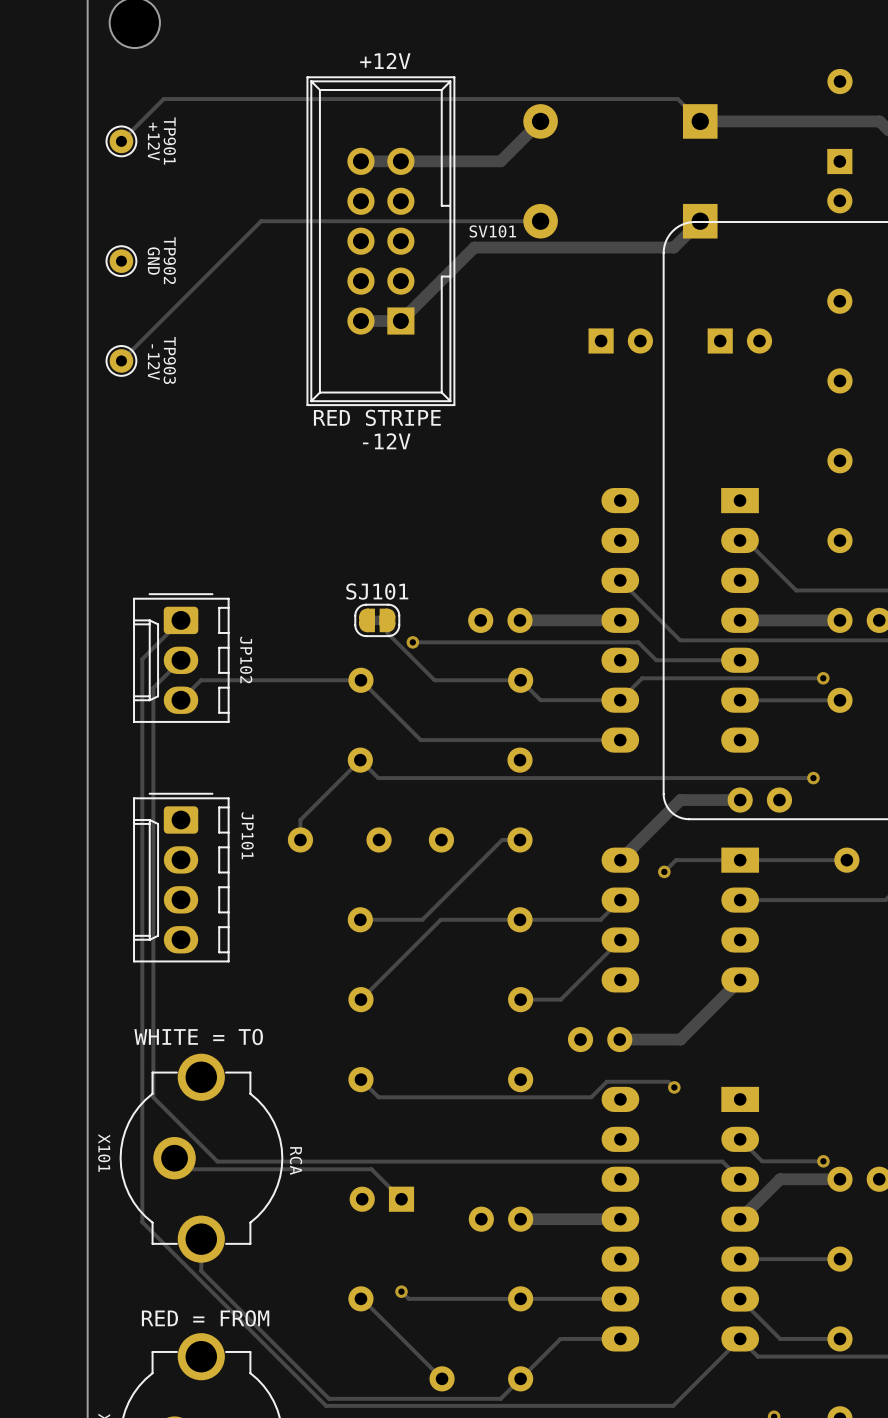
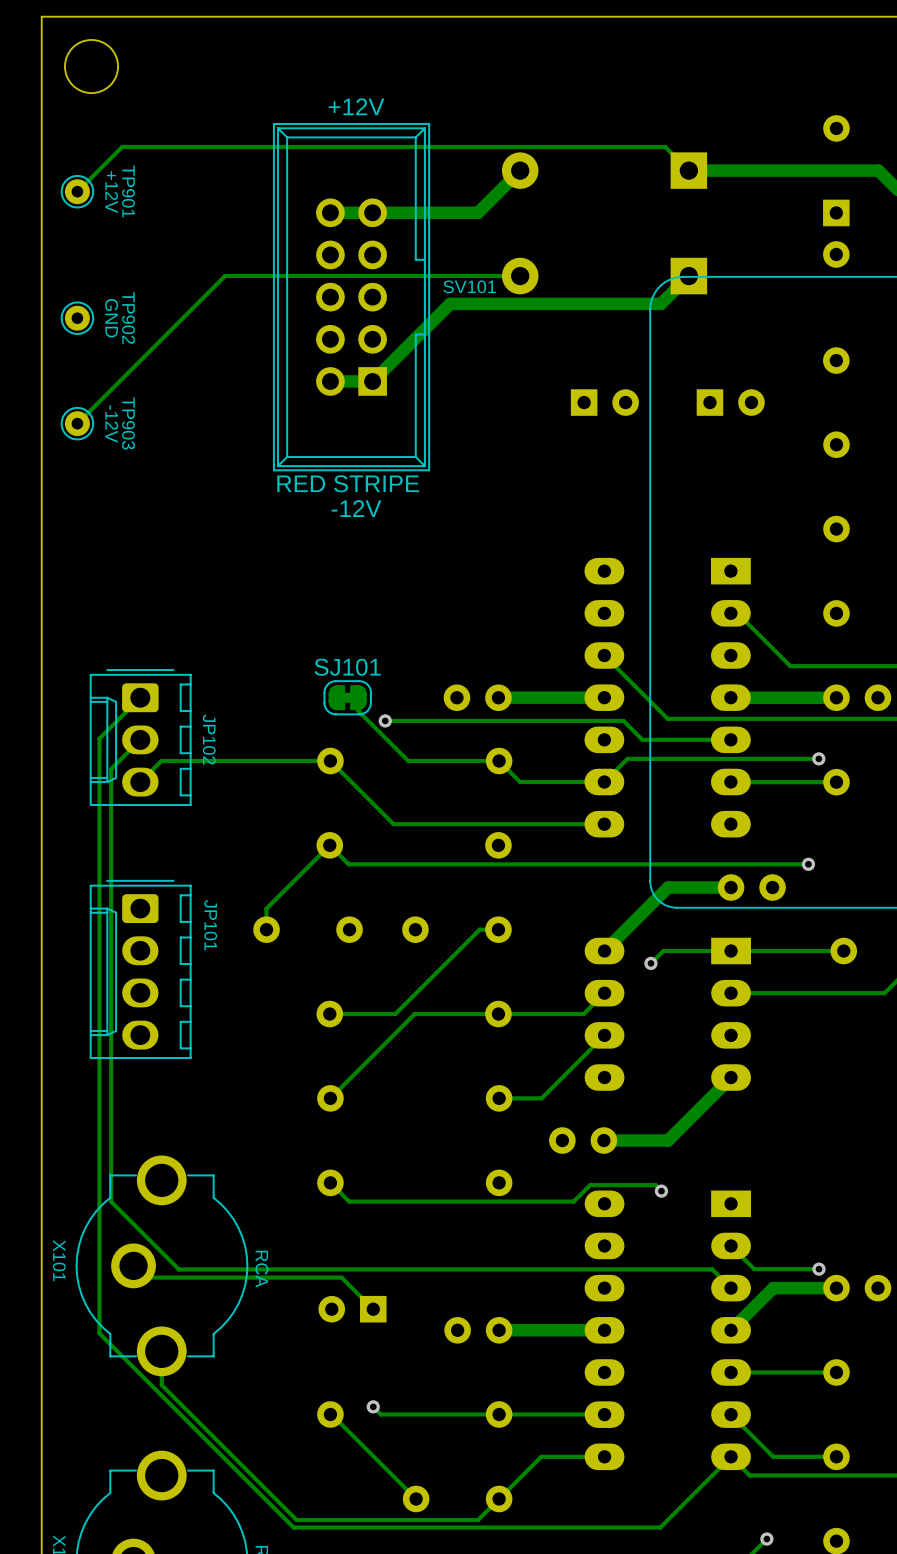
text: WHITE = TO (198, 1036) -> none
text: RED = FROM (205, 1318) -> none

